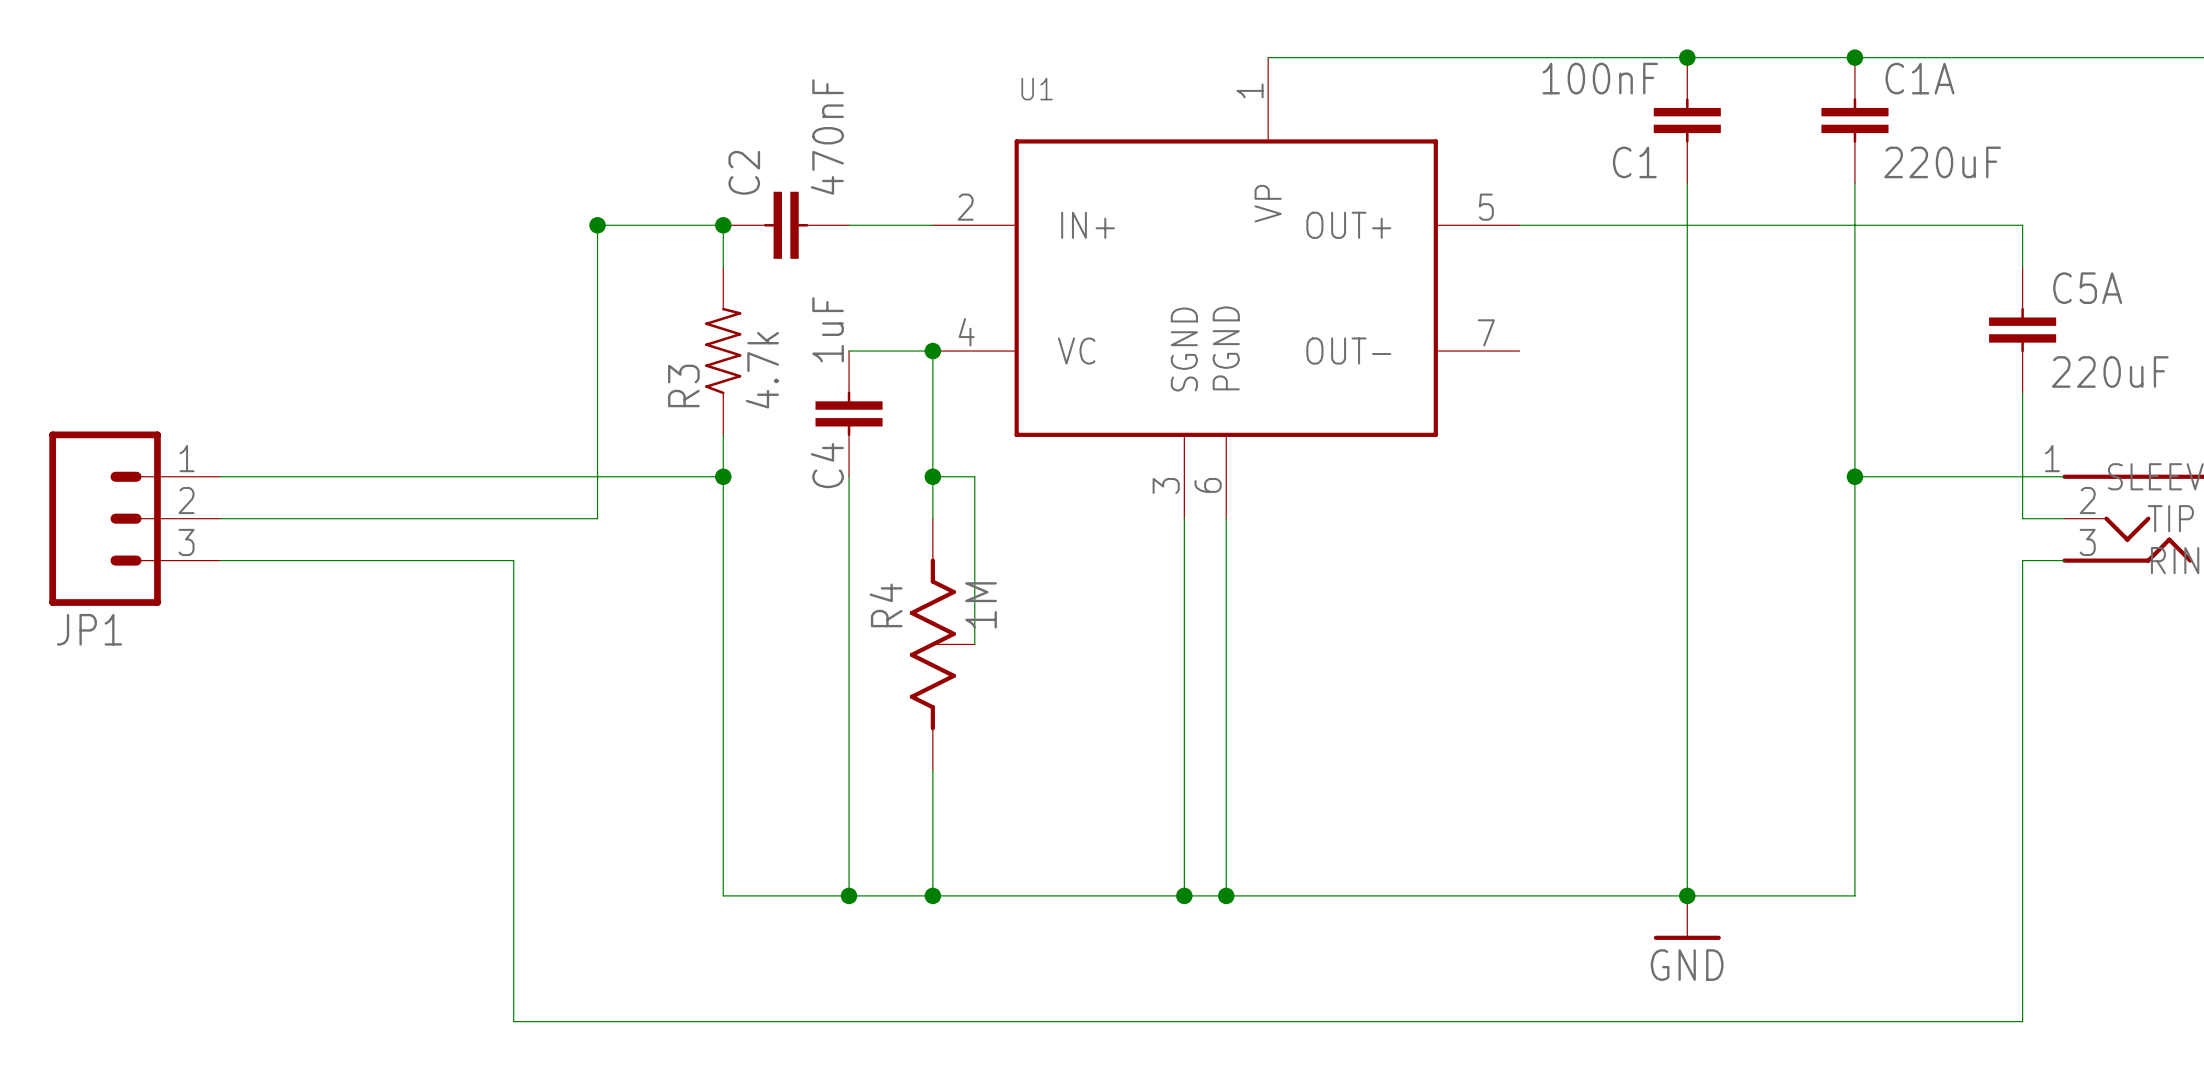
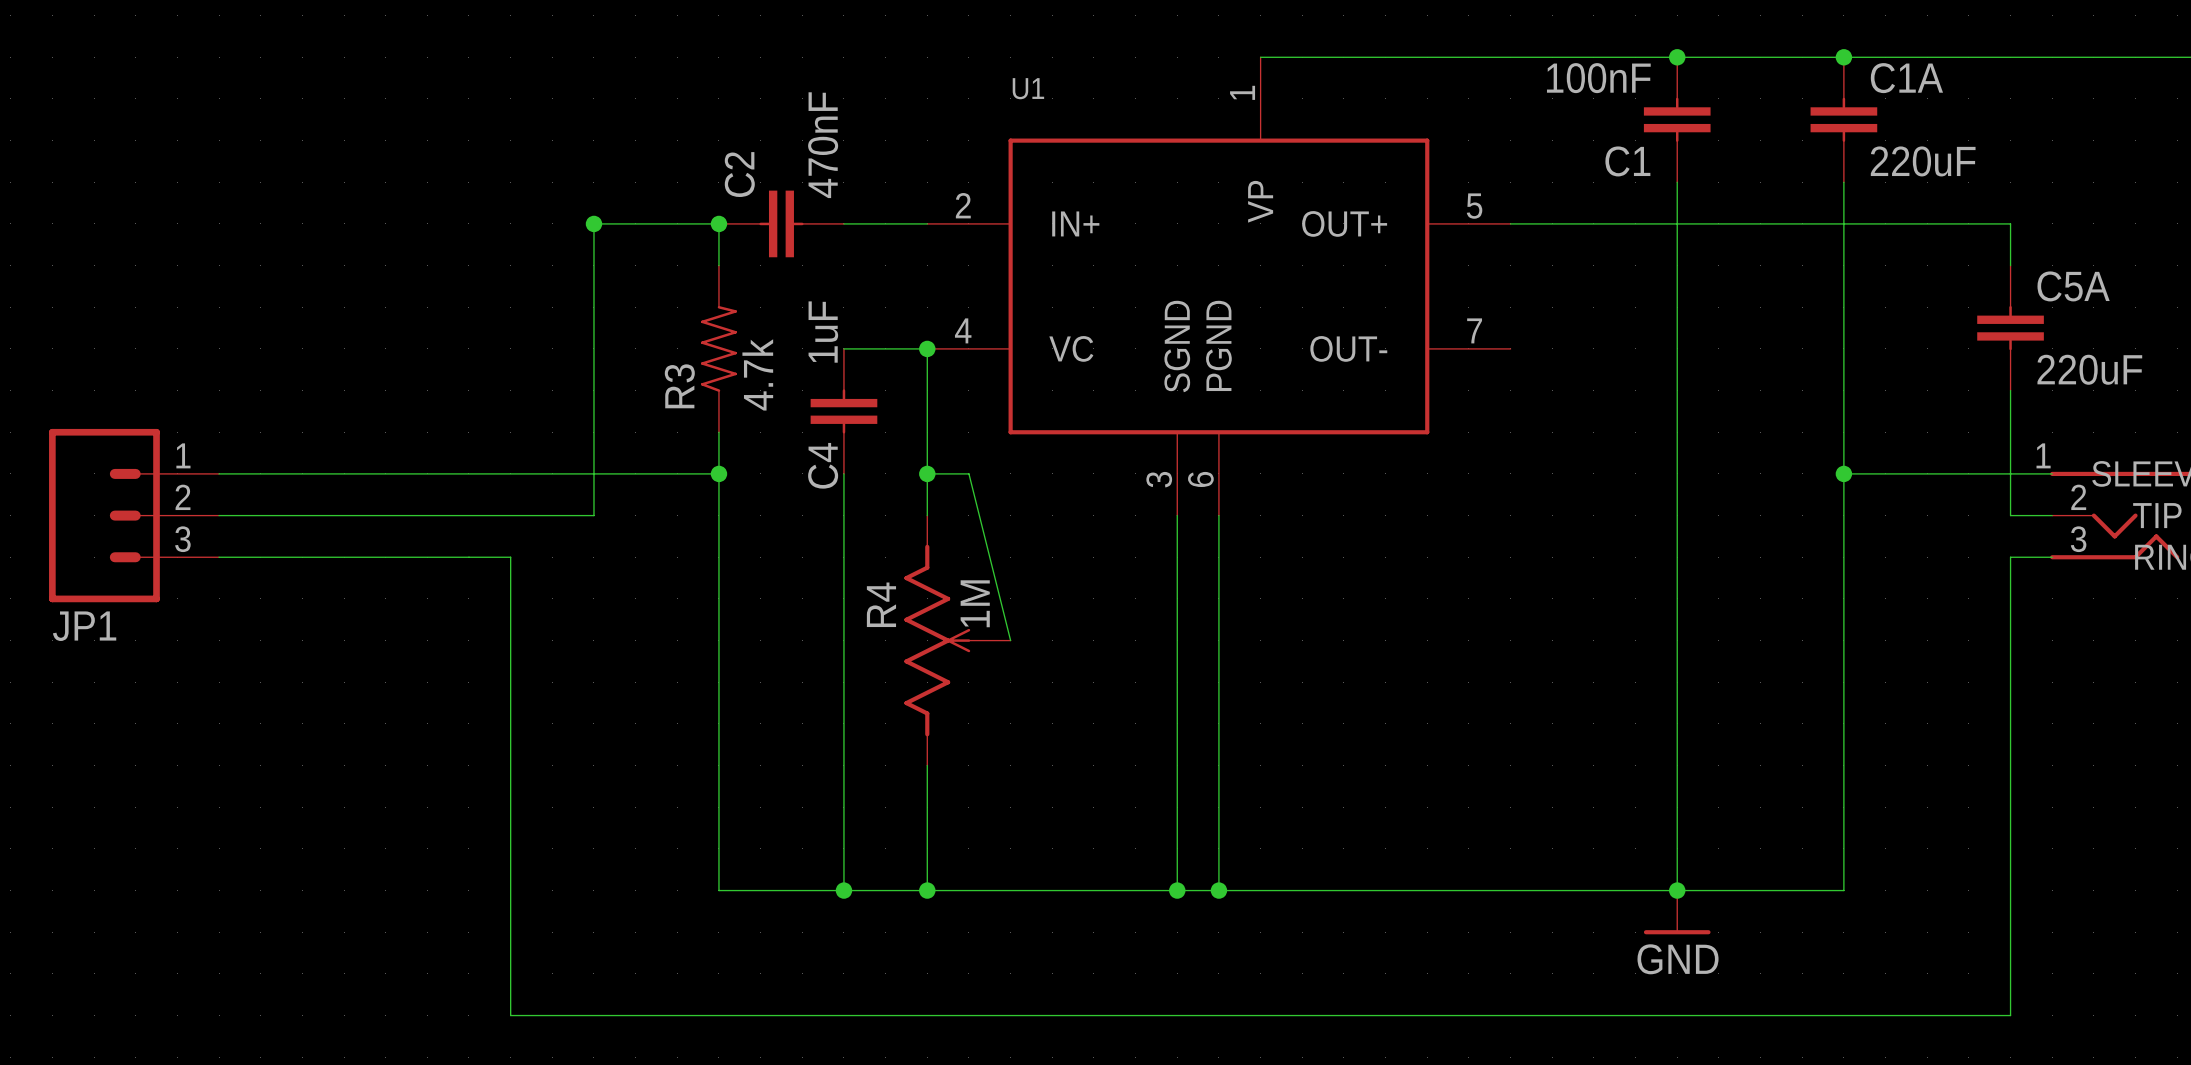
wire: (974, 476) (974, 644) -> (968, 473) (1010, 640)
R4 symbol: [909, 518, 975, 771] -> [904, 515, 1011, 766]

